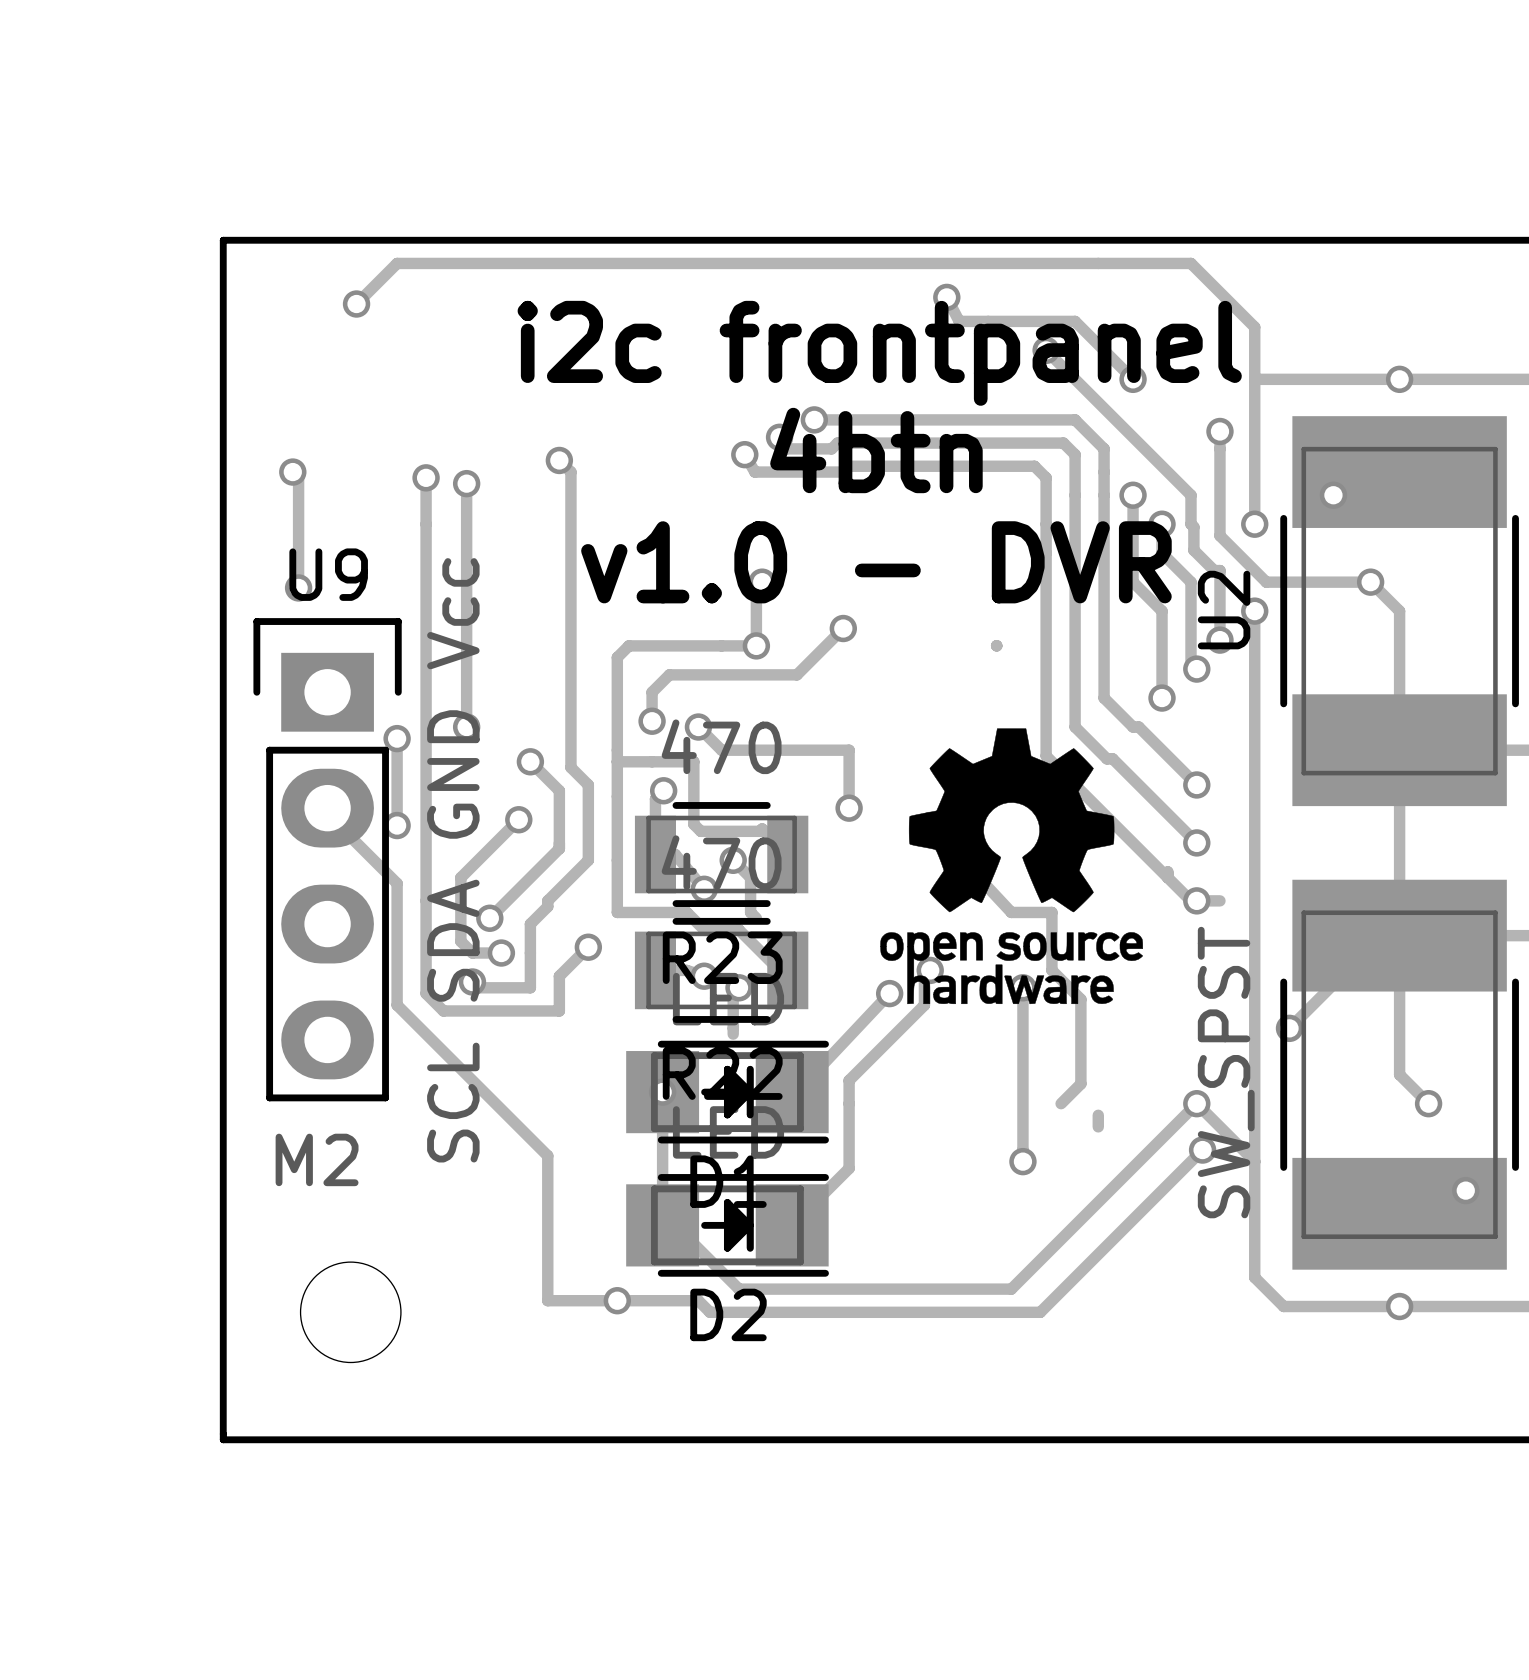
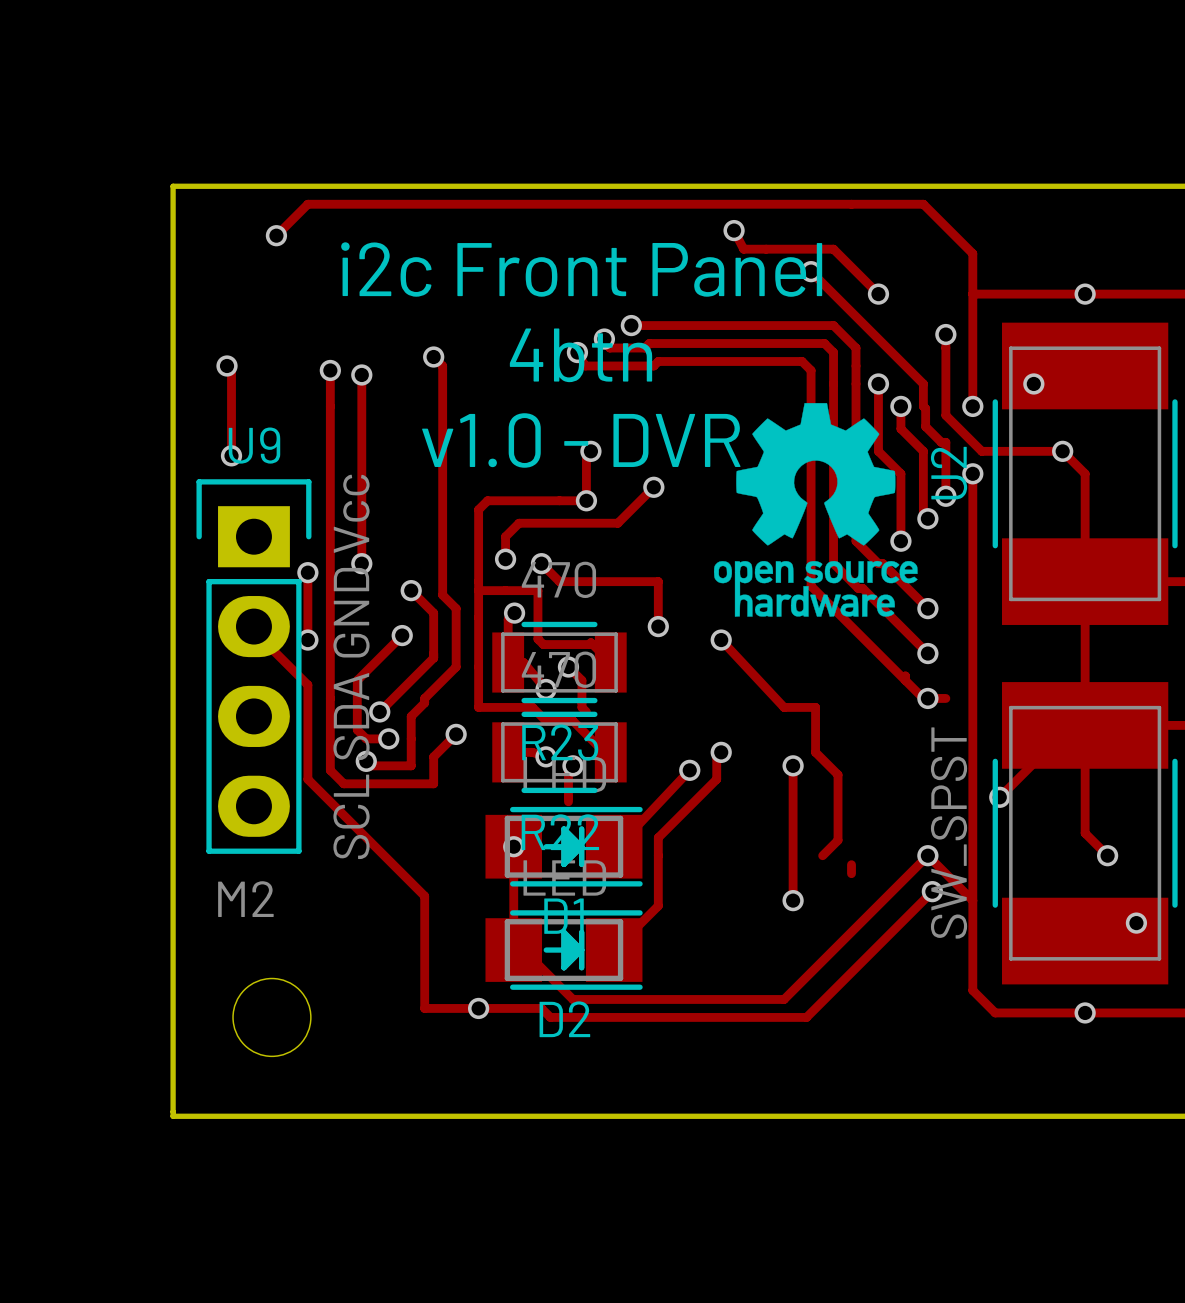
text: i2c frontpanel (879, 353) -> i2c Front Panel (581, 269)
text position: 4btn (876, 450) -> 4btn (581, 355)
text position: v1.0 - DVR (876, 562) -> v1.0 - DVR (581, 440)
drawing position: (1011, 866) -> (815, 509)

